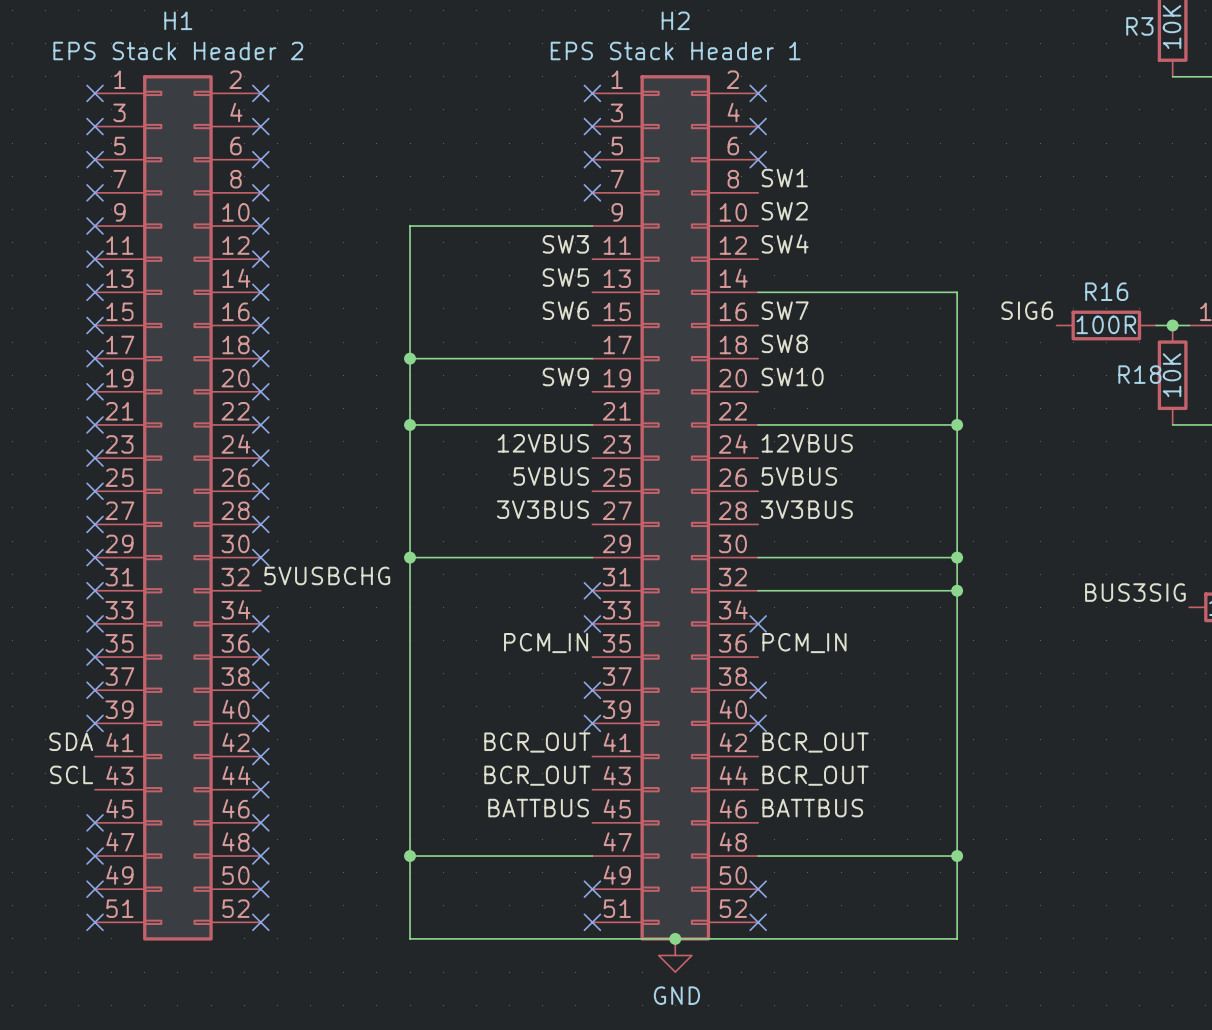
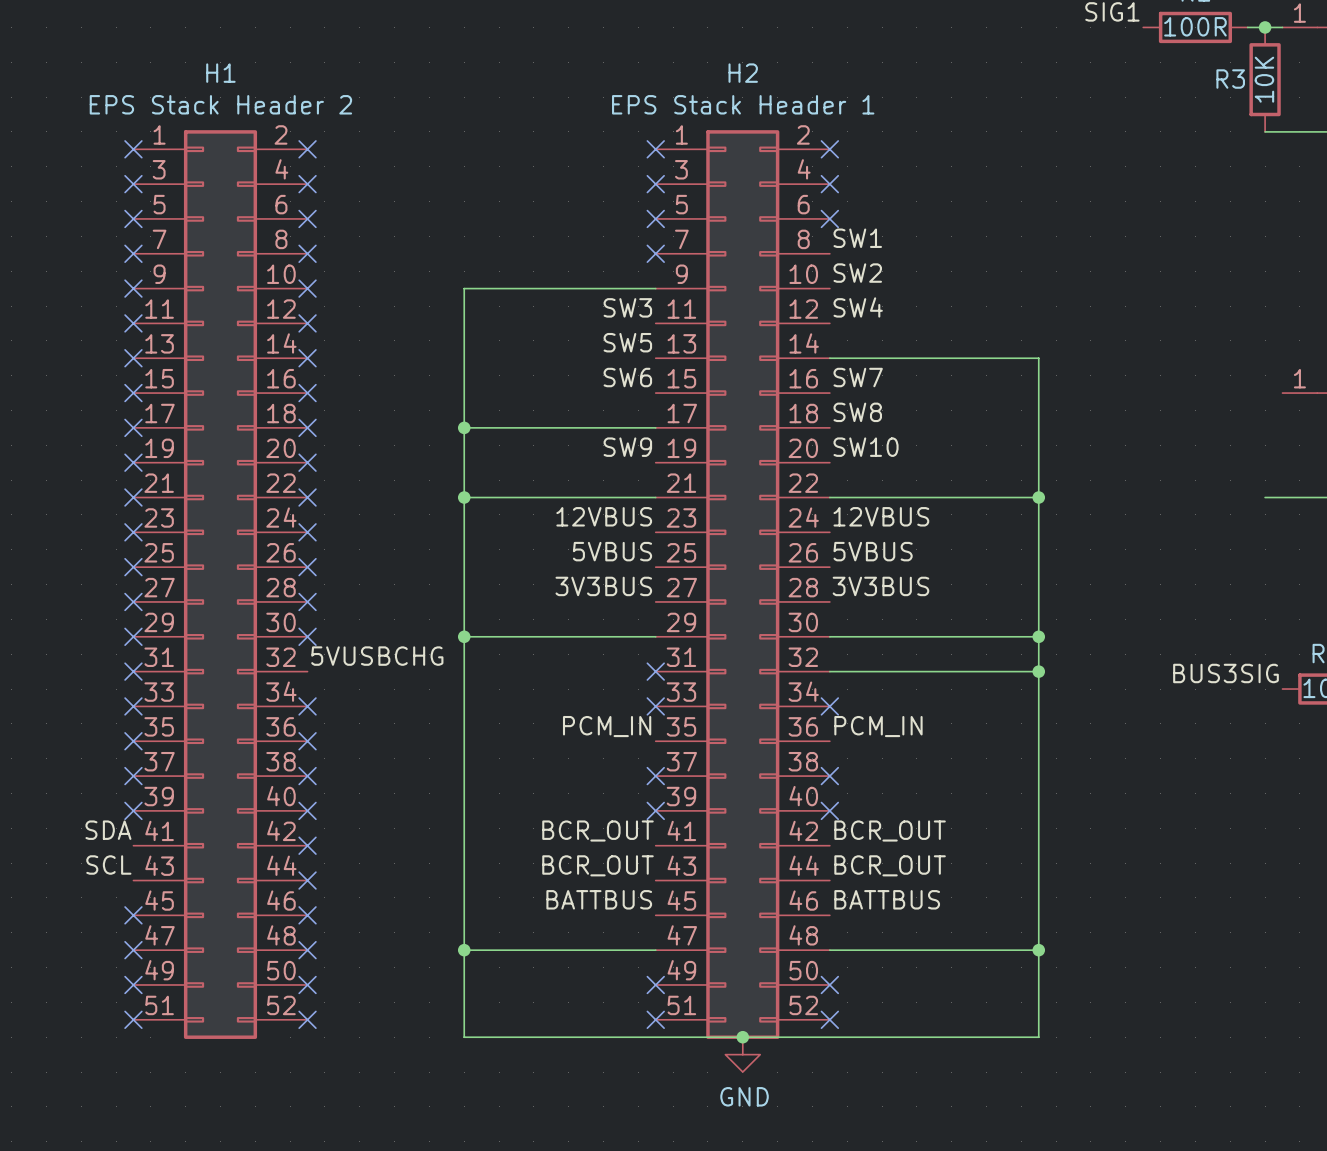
label: SIG6 (1027, 310) -> none
R16: 100R (1106, 325) -> none
wire: (1156, 325) (1189, 325) -> none
junction: (1172, 325) -> none
R18: 10K (1172, 375) -> none

